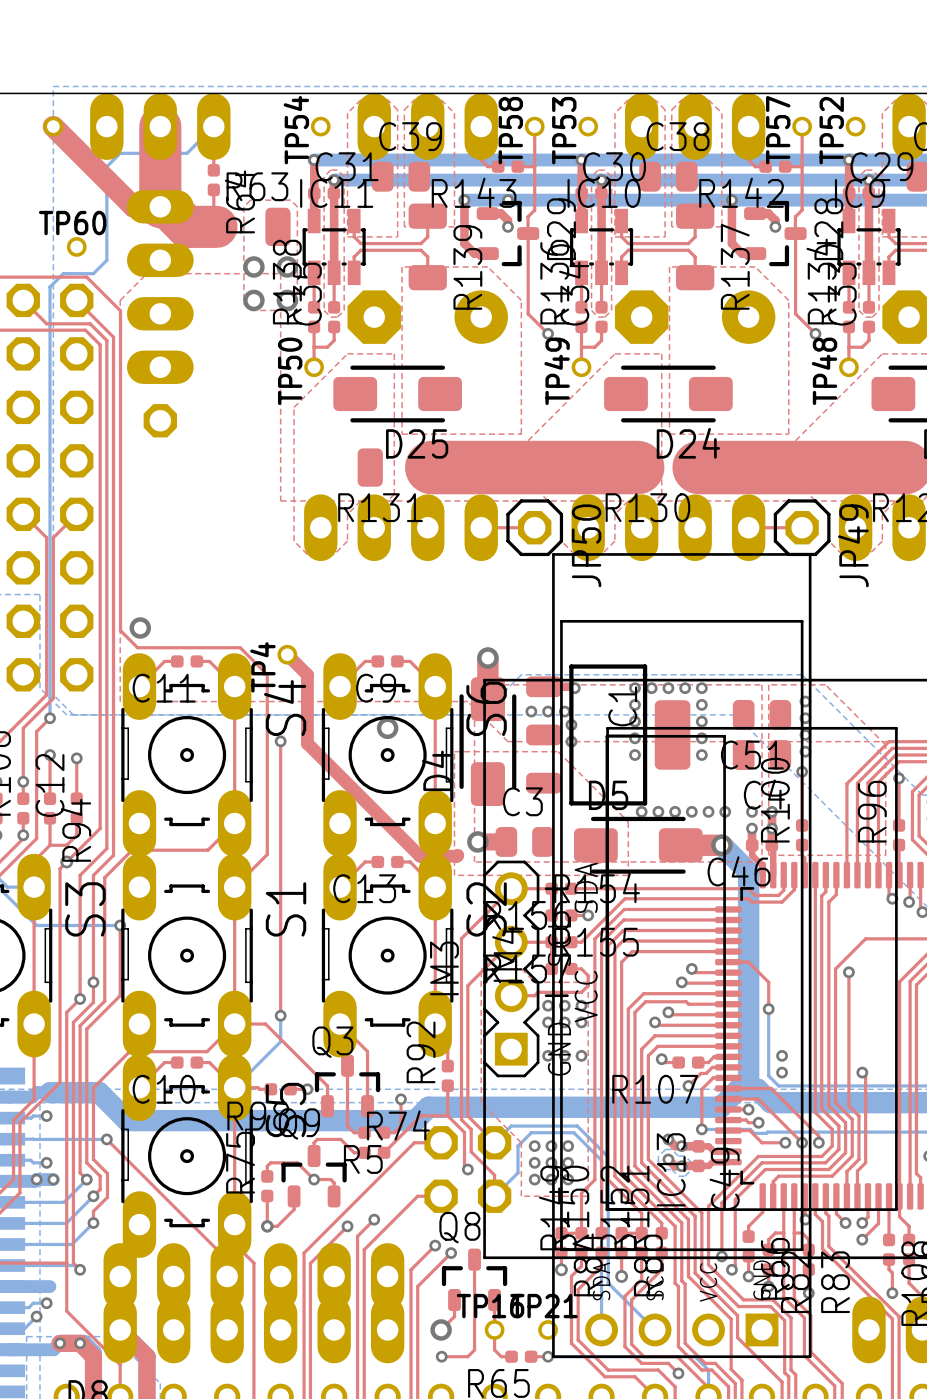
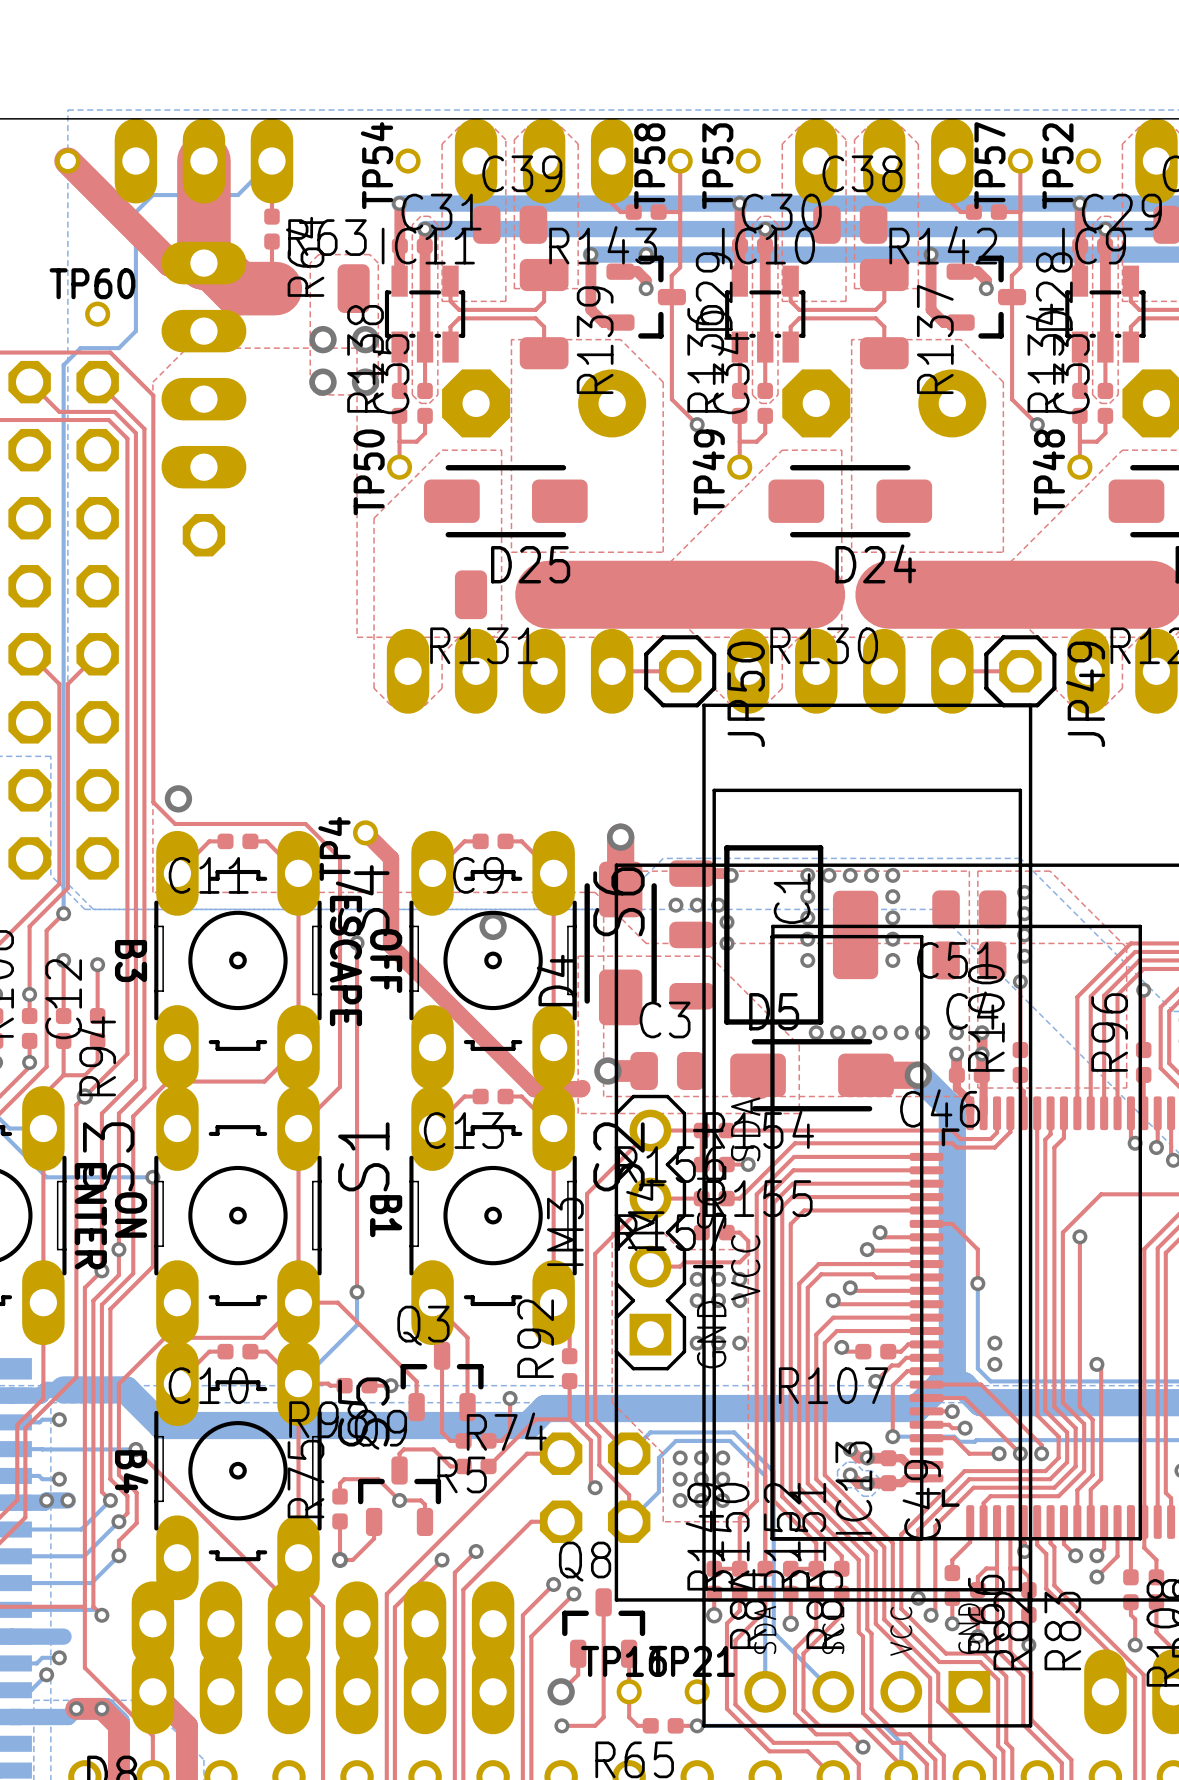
text: none -> B3 (131, 961)
text: none -> ESCAPE (345, 961)
text: none -> OFF (386, 961)
text: none -> ON (131, 1215)
text: none -> ENTER (90, 1216)
text: none -> B1 (386, 1216)
text: none -> B4 (131, 1471)

